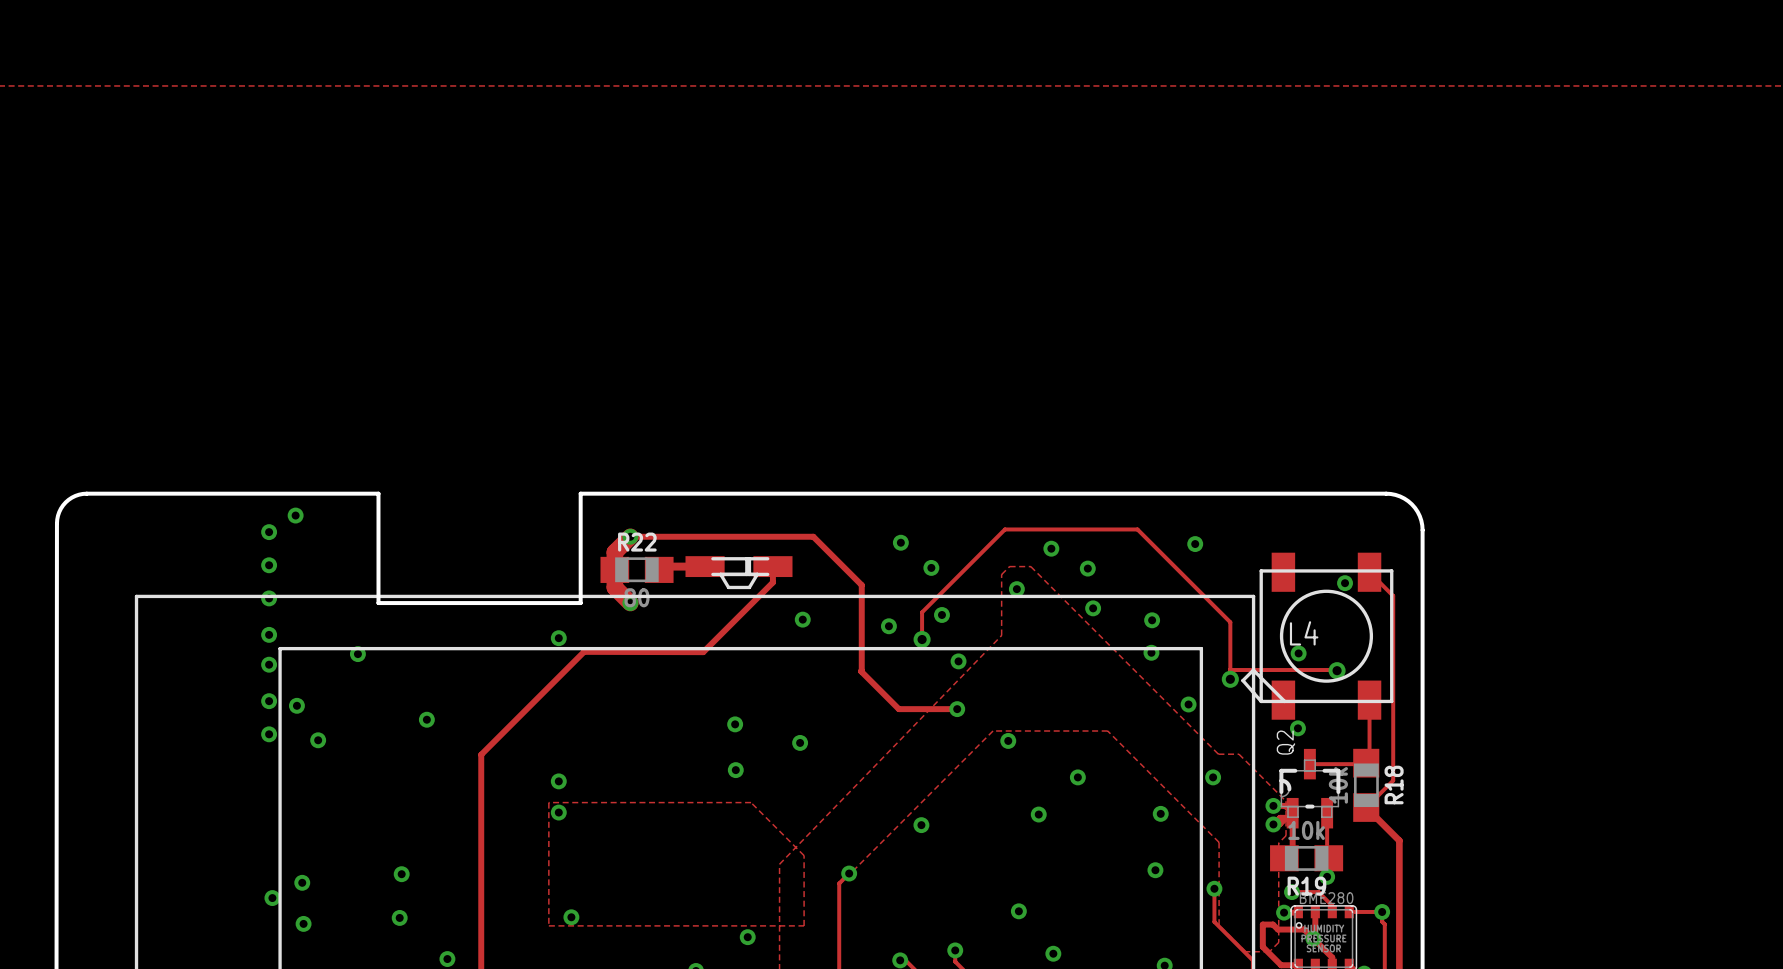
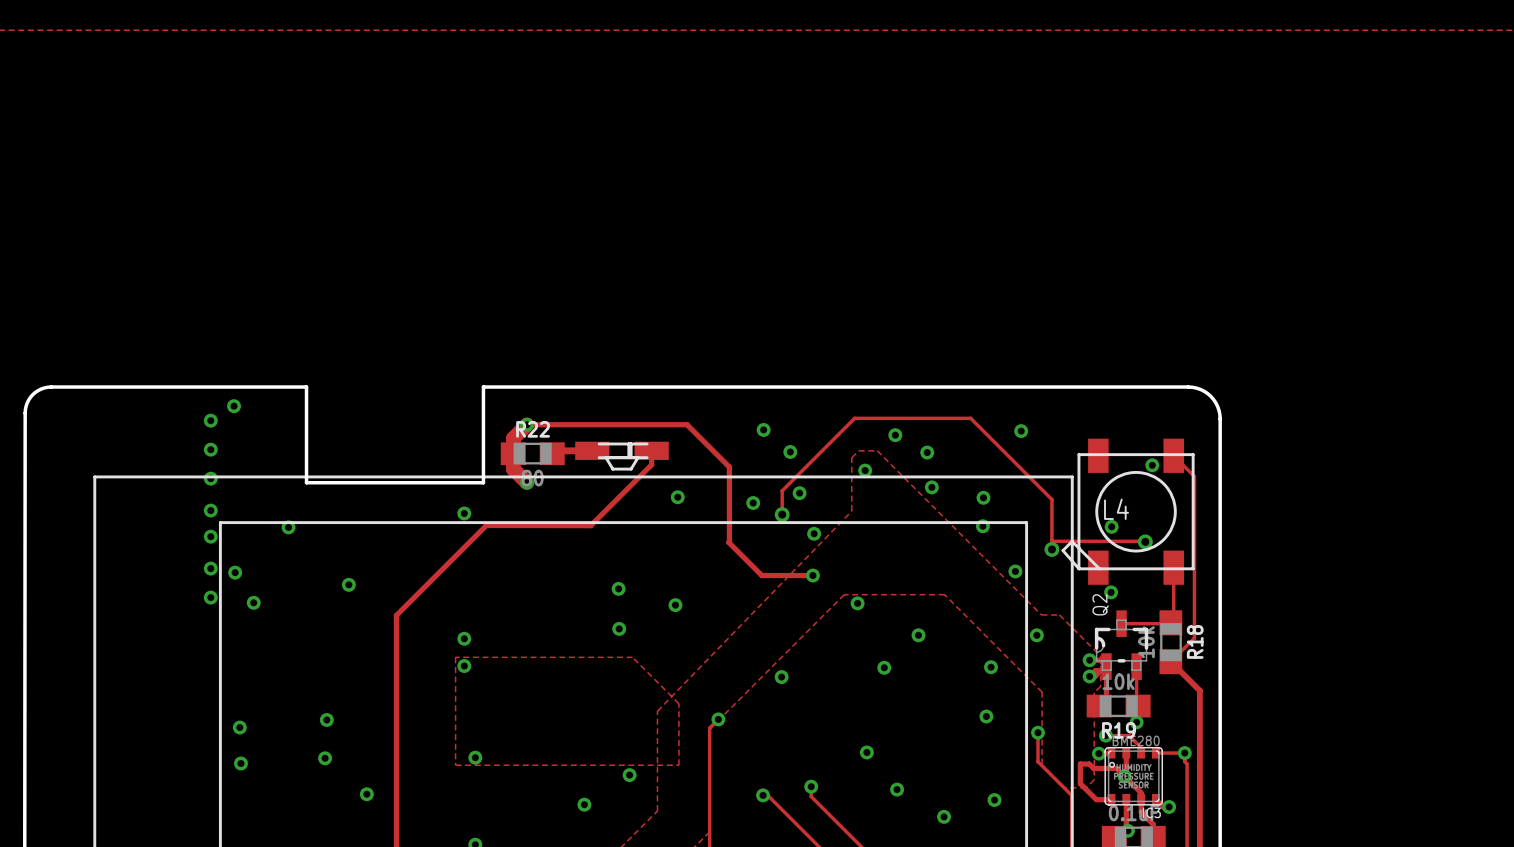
via: (272, 898) -> none

